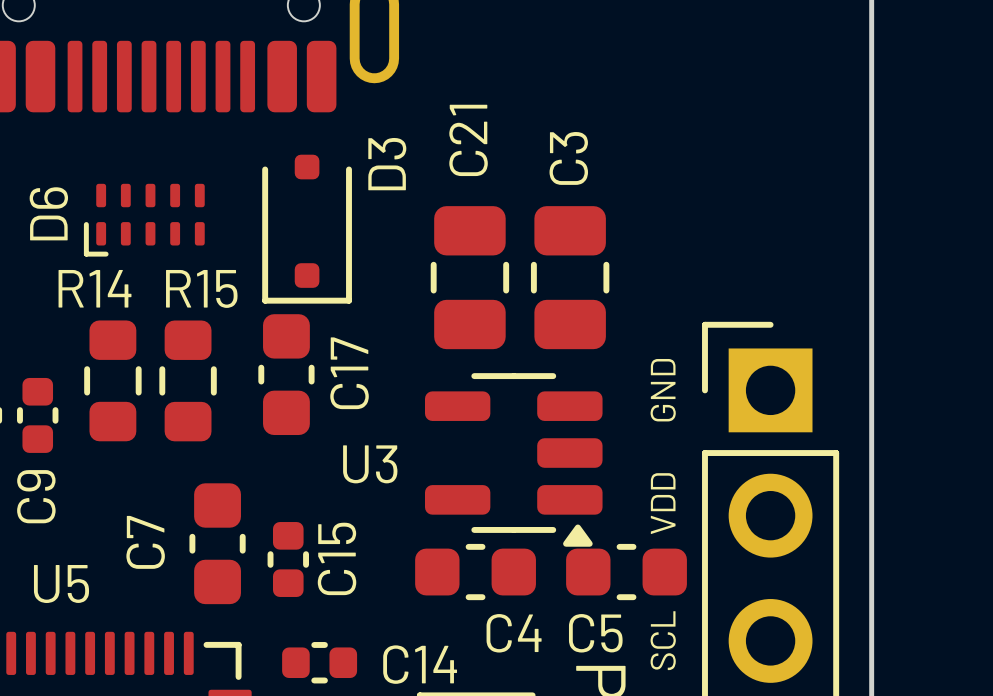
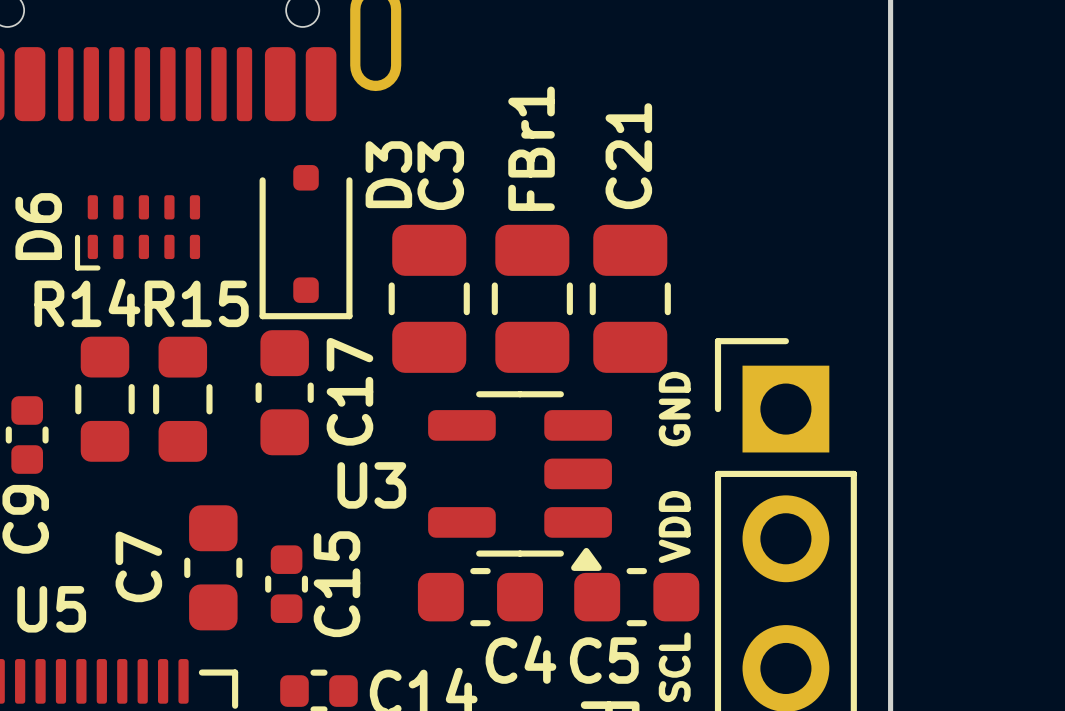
C3 name position: C3 (568, 158) -> C3 (440, 175)
C21 position: (469, 277) -> (630, 298)
C3 position: (570, 277) -> (429, 298)
FBr1: none -> (532, 298)

